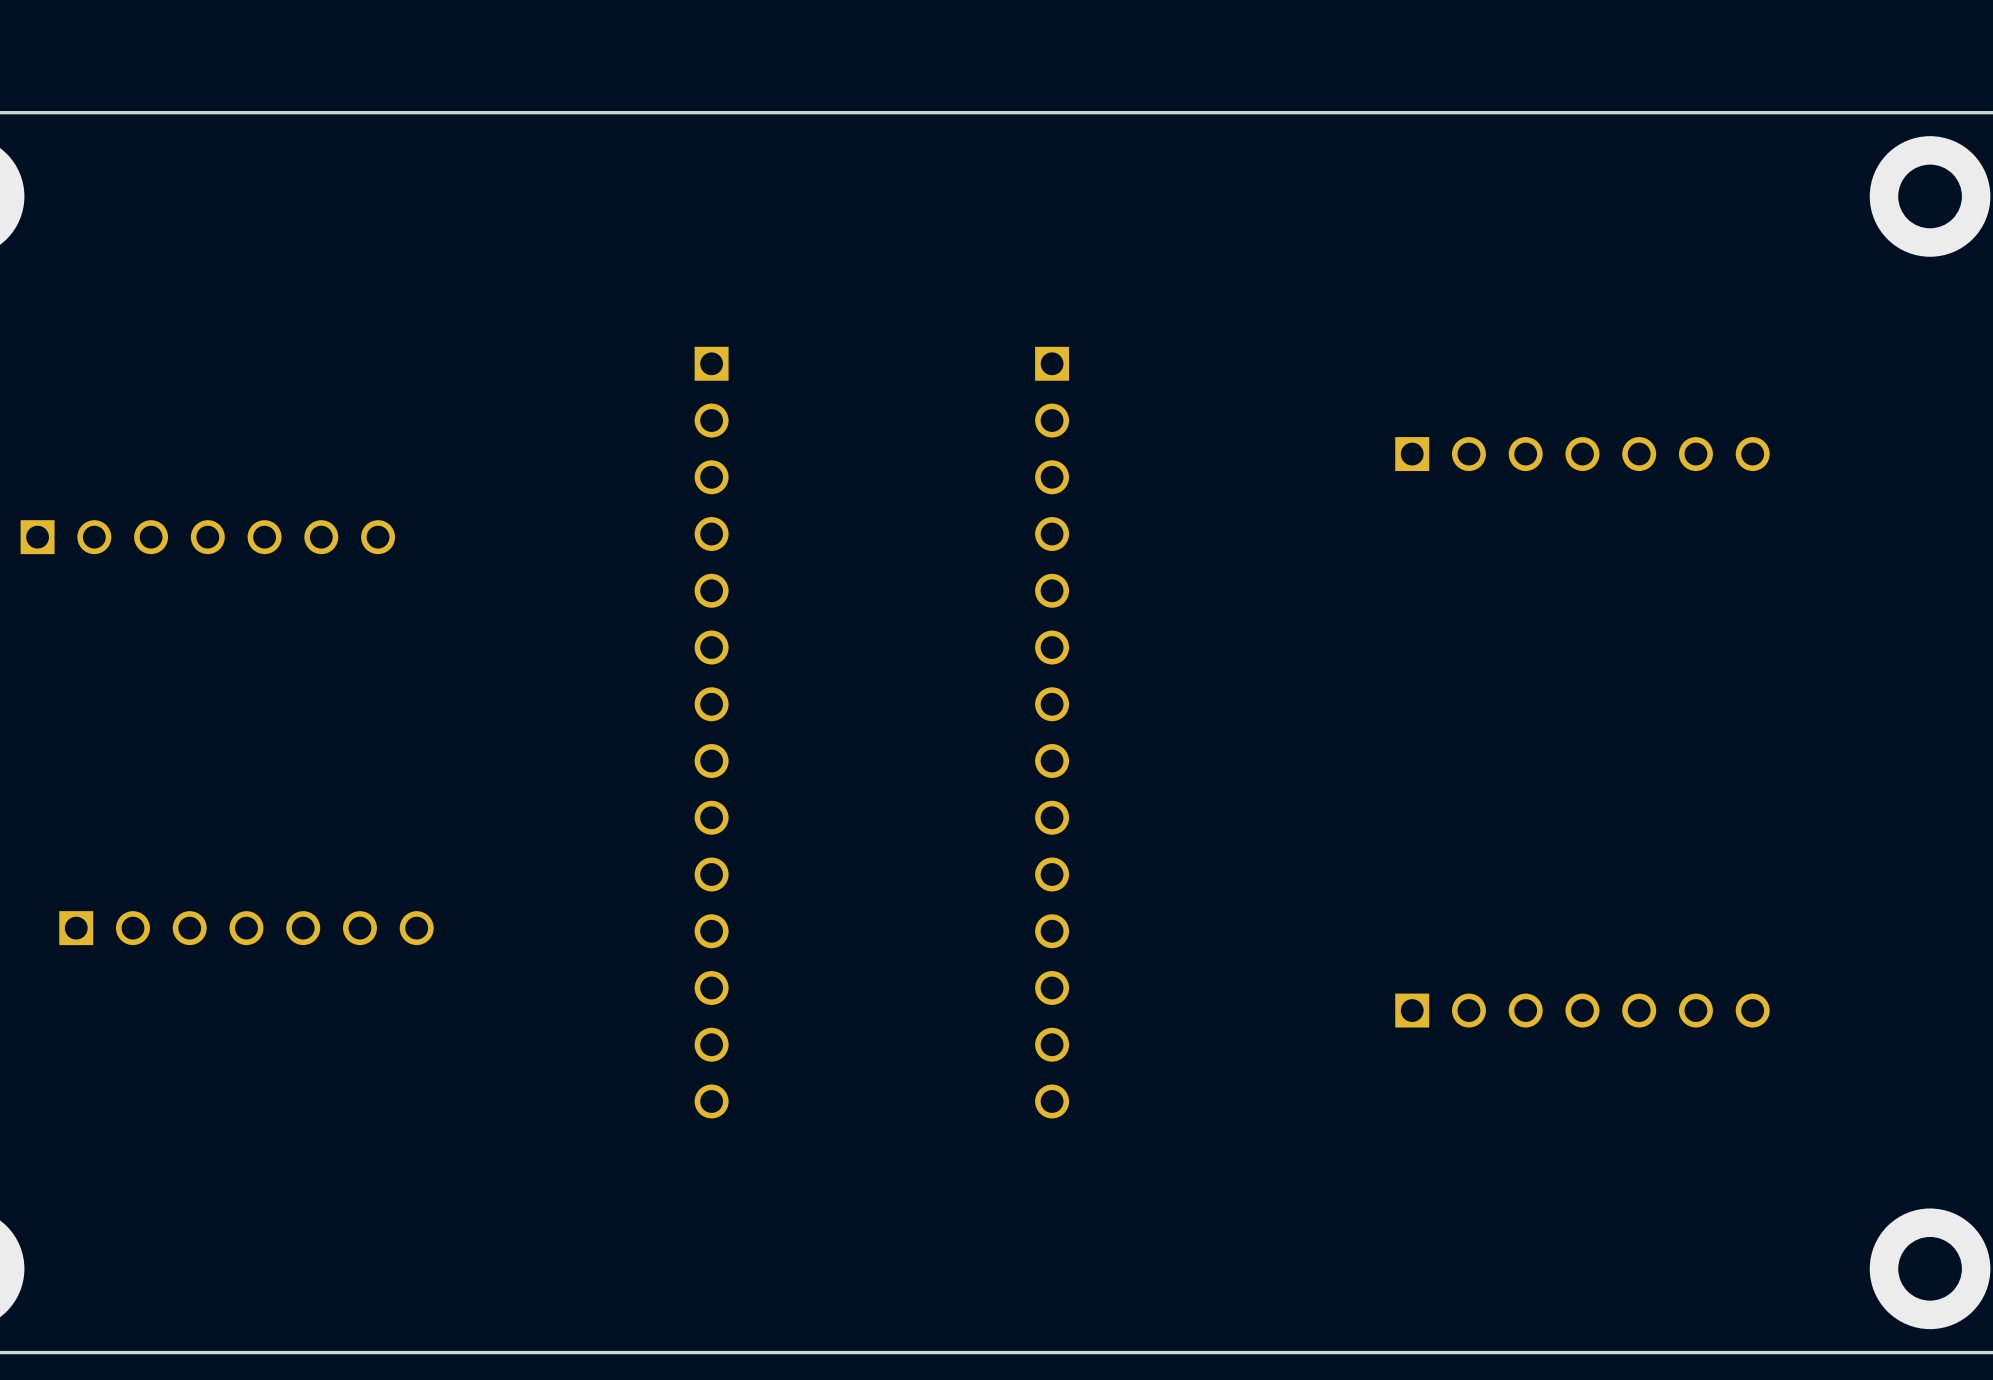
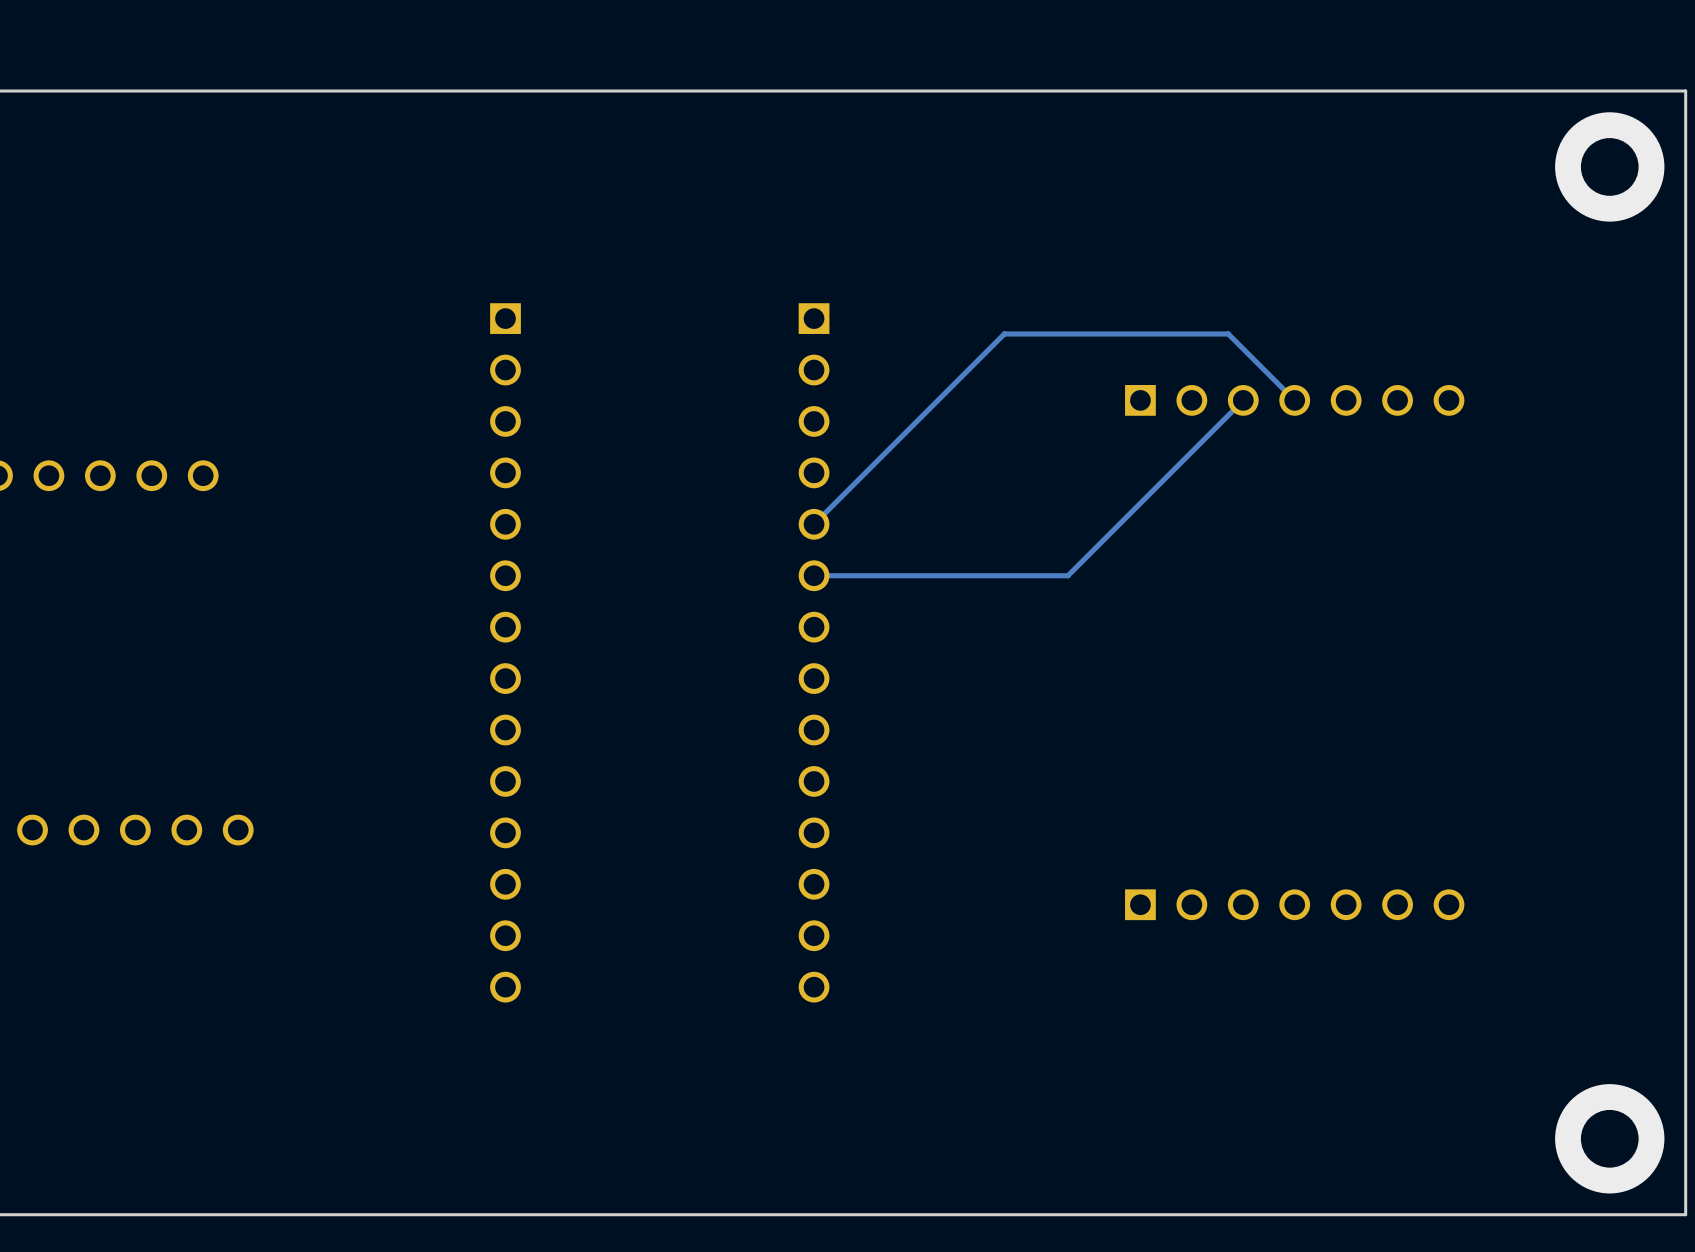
track: none -> (1243, 400) (1067, 575) (814, 575)
track: none -> (1294, 400) (1228, 333) (1004, 333) (814, 524)

